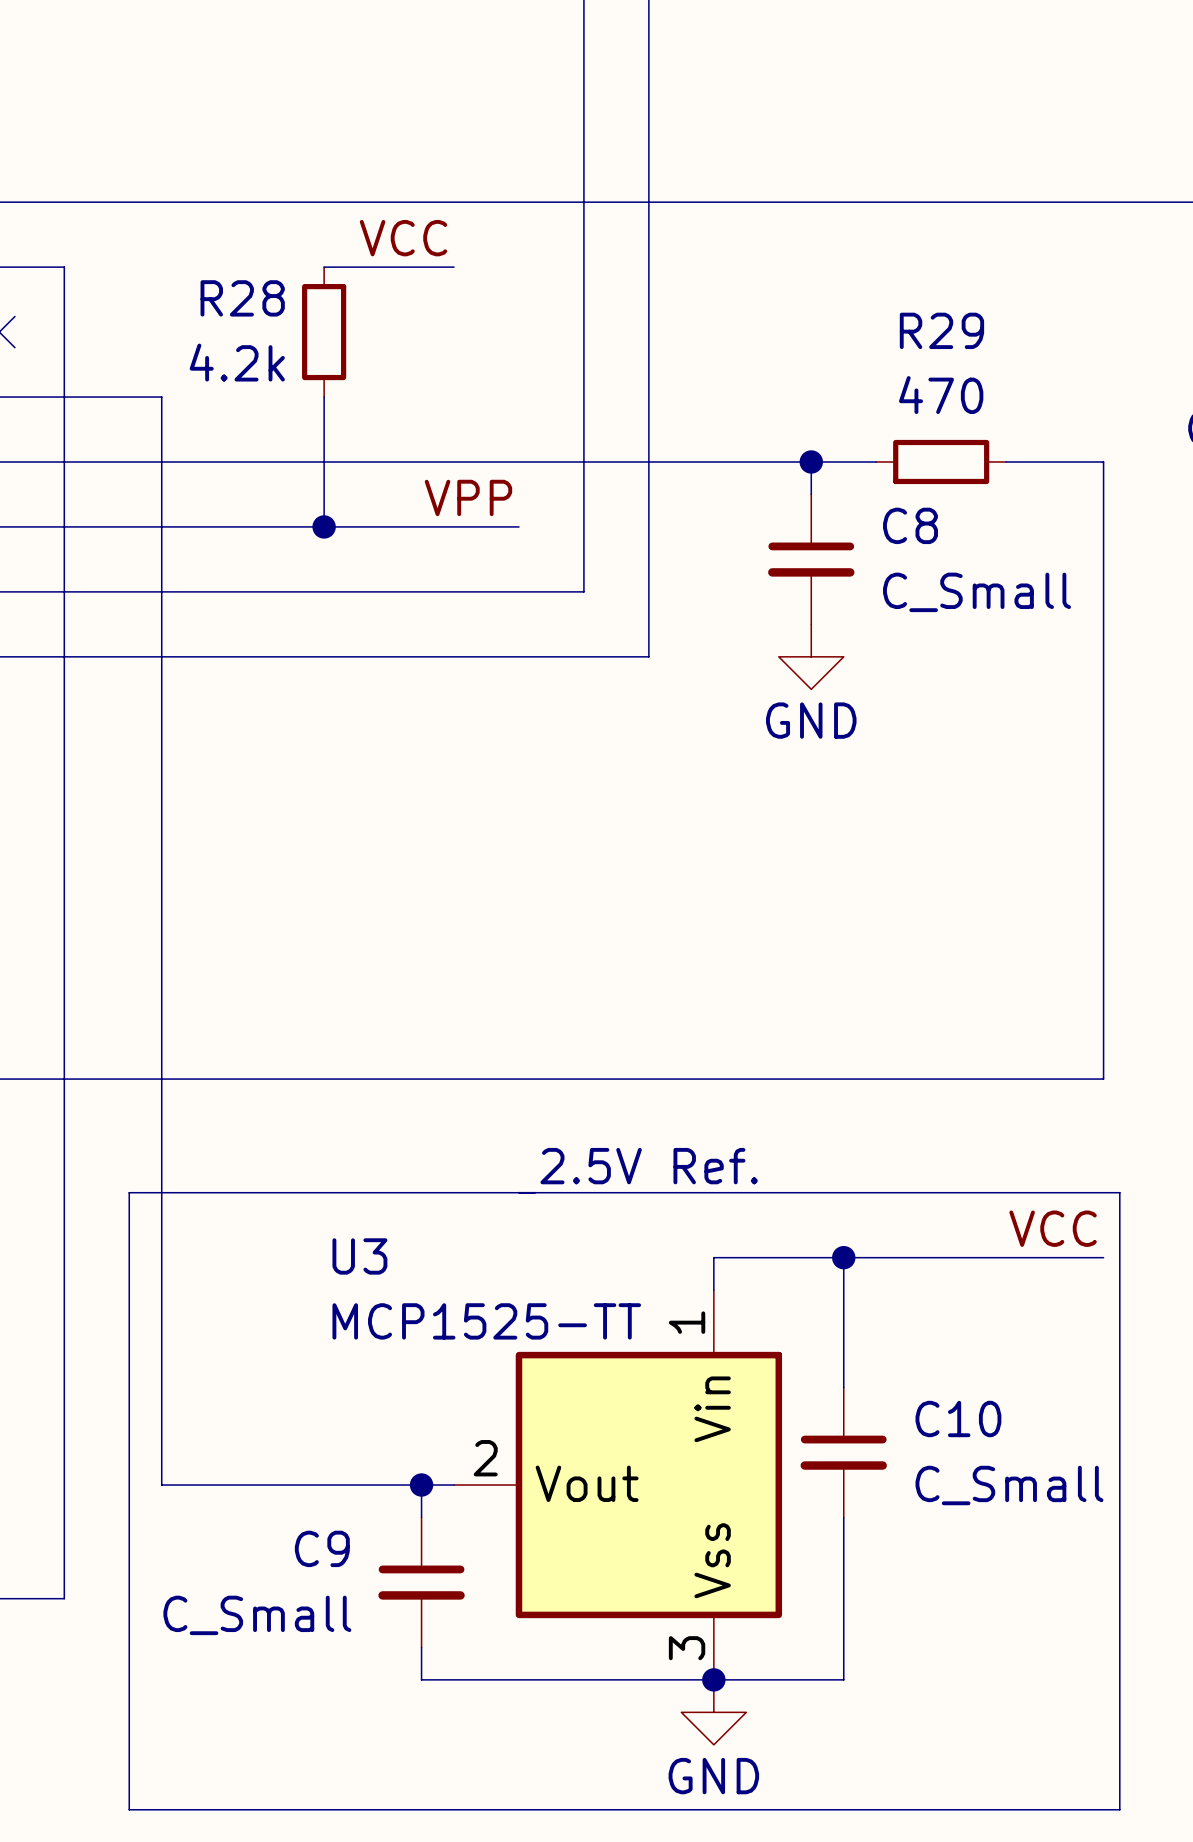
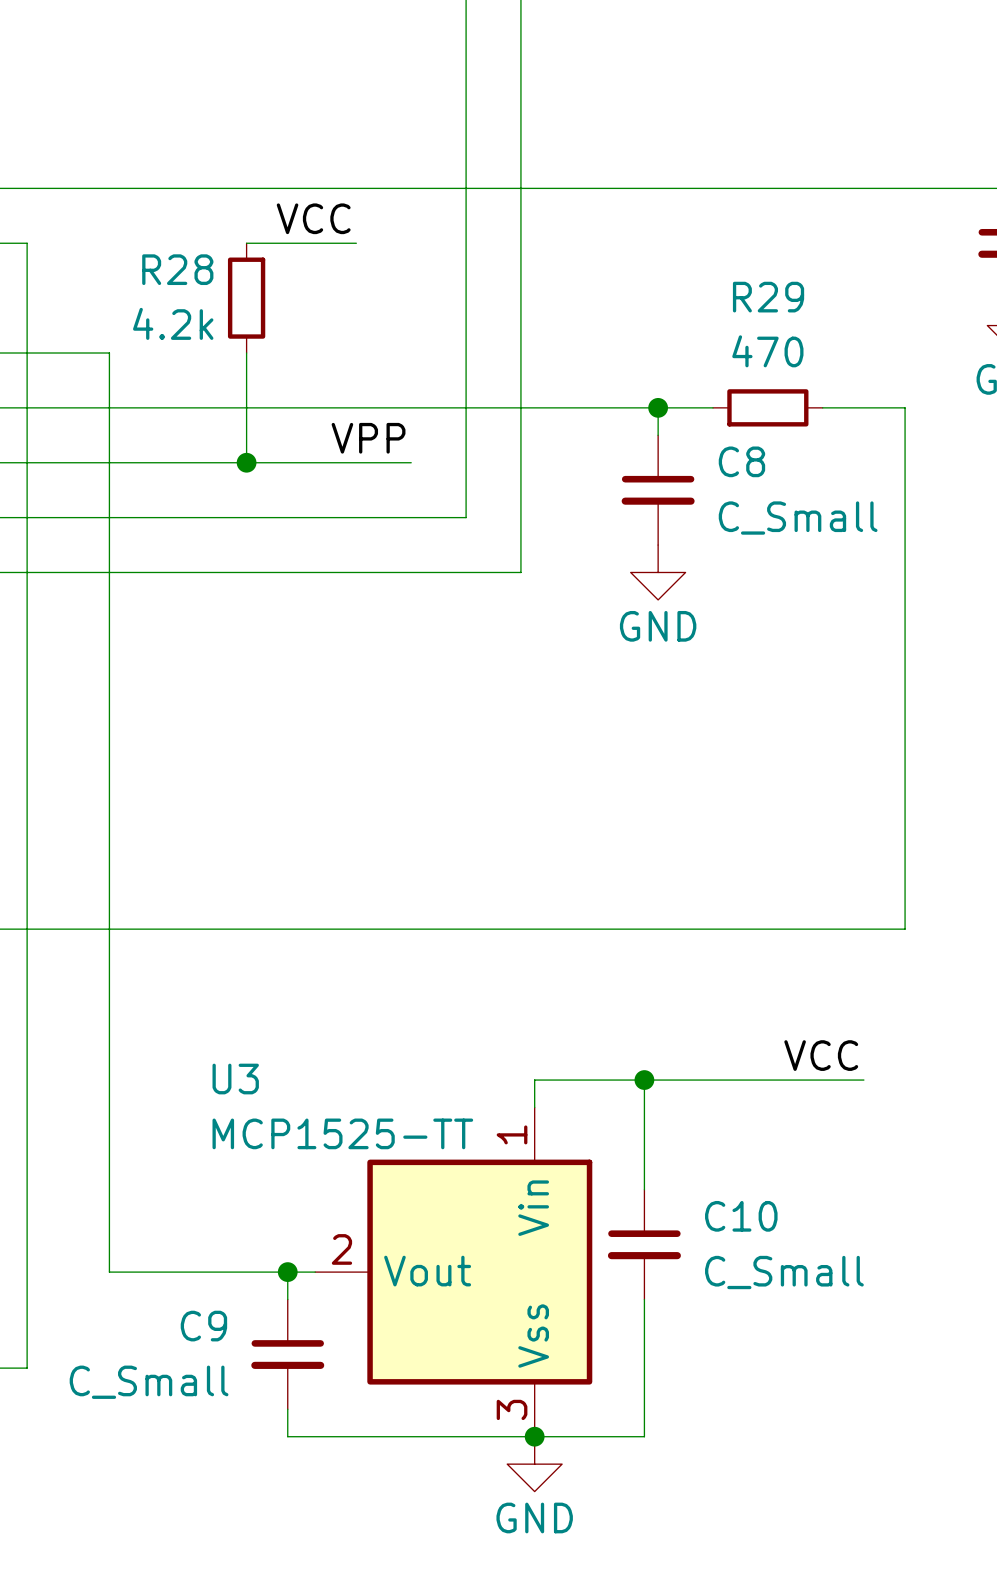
text: 2.5V Ref. (649, 1166) -> none
line: (129, 1192) (1119, 1192) (1119, 1809) (129, 1809) (129, 1192) -> none
label position: VCC (1053, 1228) -> VCC (821, 1055)
wire: (713, 1257) (713, 1290) -> (575, 1080) (534, 1080) (534, 1107)
wire: (843, 1257) (843, 1387) -> (644, 1080) (644, 1189)
junction position: (843, 1257) -> (644, 1080)
wire: (1054, 1257) (1103, 1257) -> none
C10 position: (843, 1452) -> (644, 1244)
wire: (421, 1485) (421, 1517) -> (287, 1272) (287, 1299)
junction position: (421, 1485) -> (287, 1272)
U3 position: (618, 1485) -> (453, 1272)
wire: (843, 1517) (843, 1679) (795, 1679) -> (644, 1299) (644, 1436)
C9 position: (421, 1582) -> (287, 1354)
wire: (421, 1647) (421, 1679) -> (287, 1409) (287, 1436) (328, 1436)
junction position: (713, 1679) -> (534, 1436)
power symbol position: GND (713, 1712) -> GND (534, 1464)

